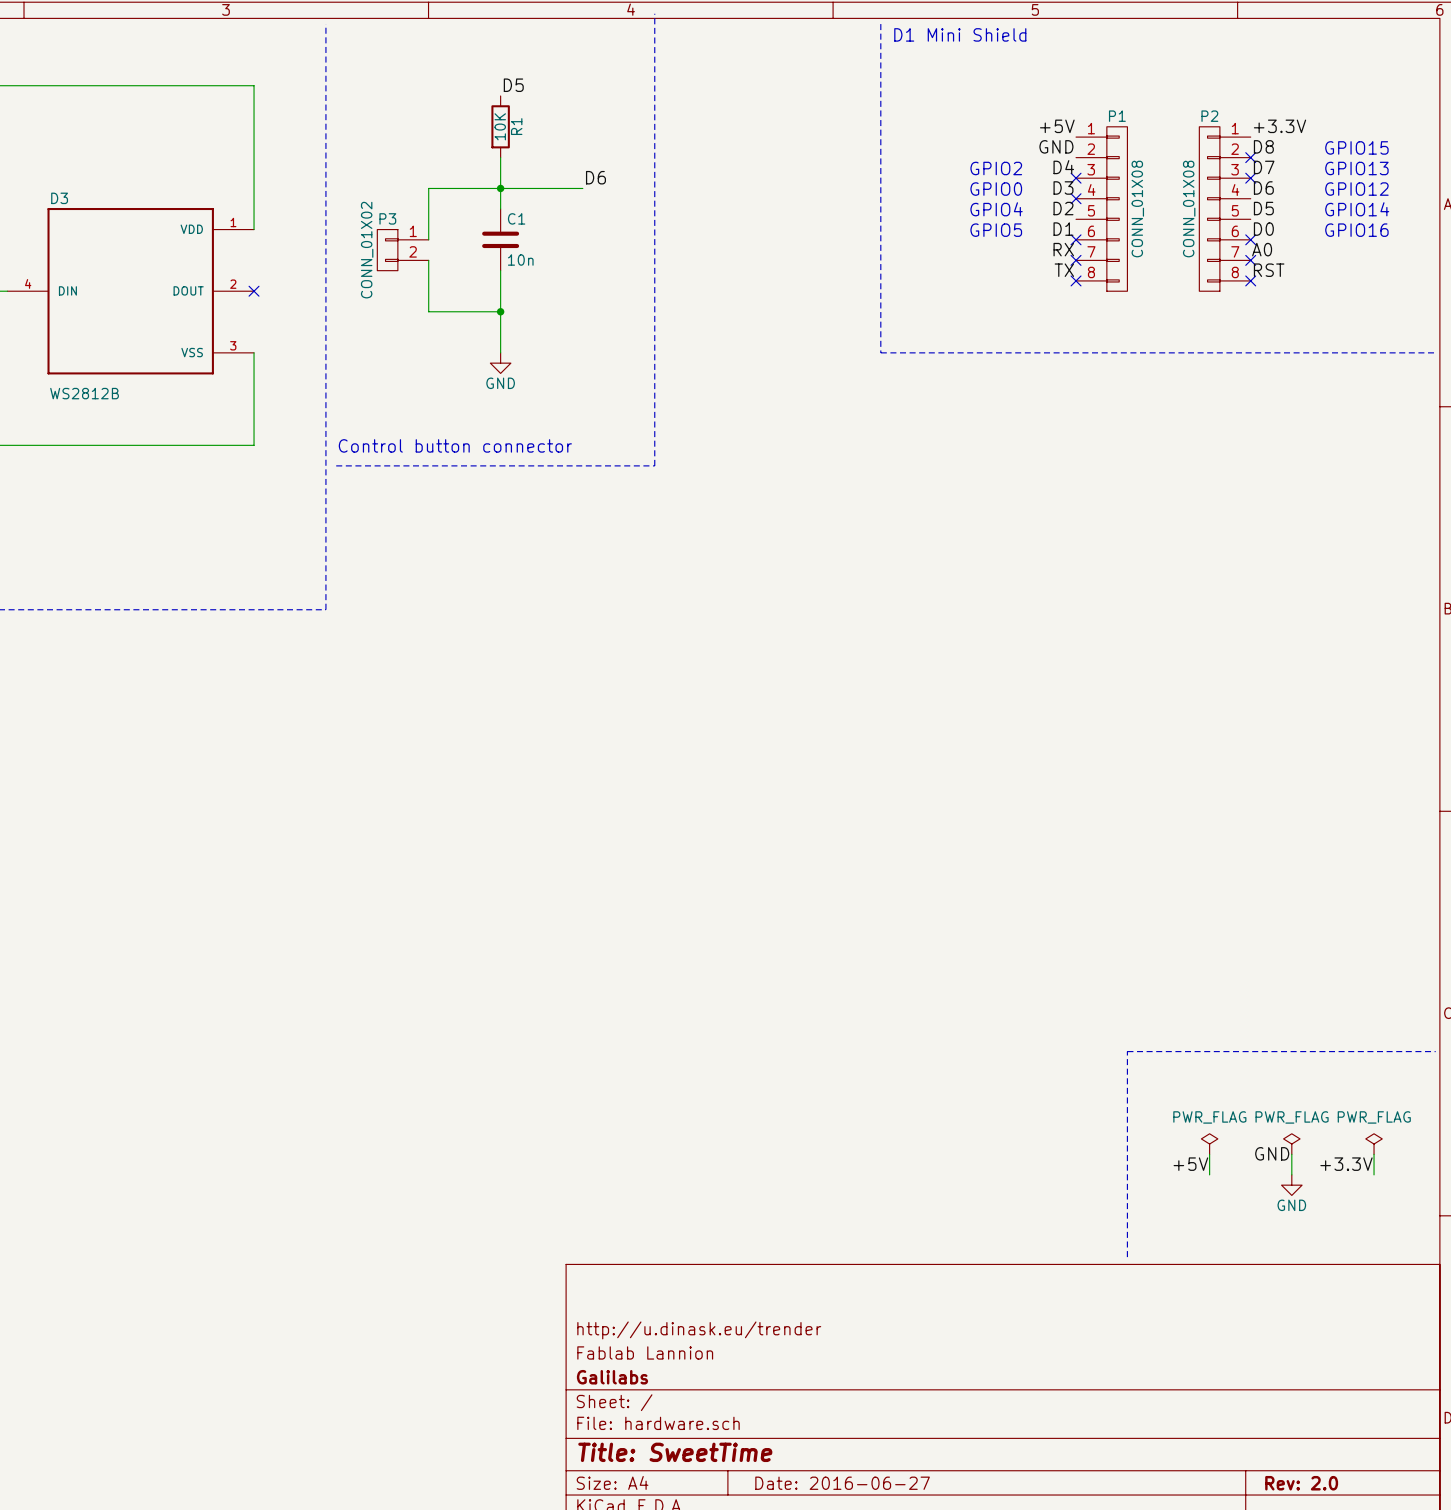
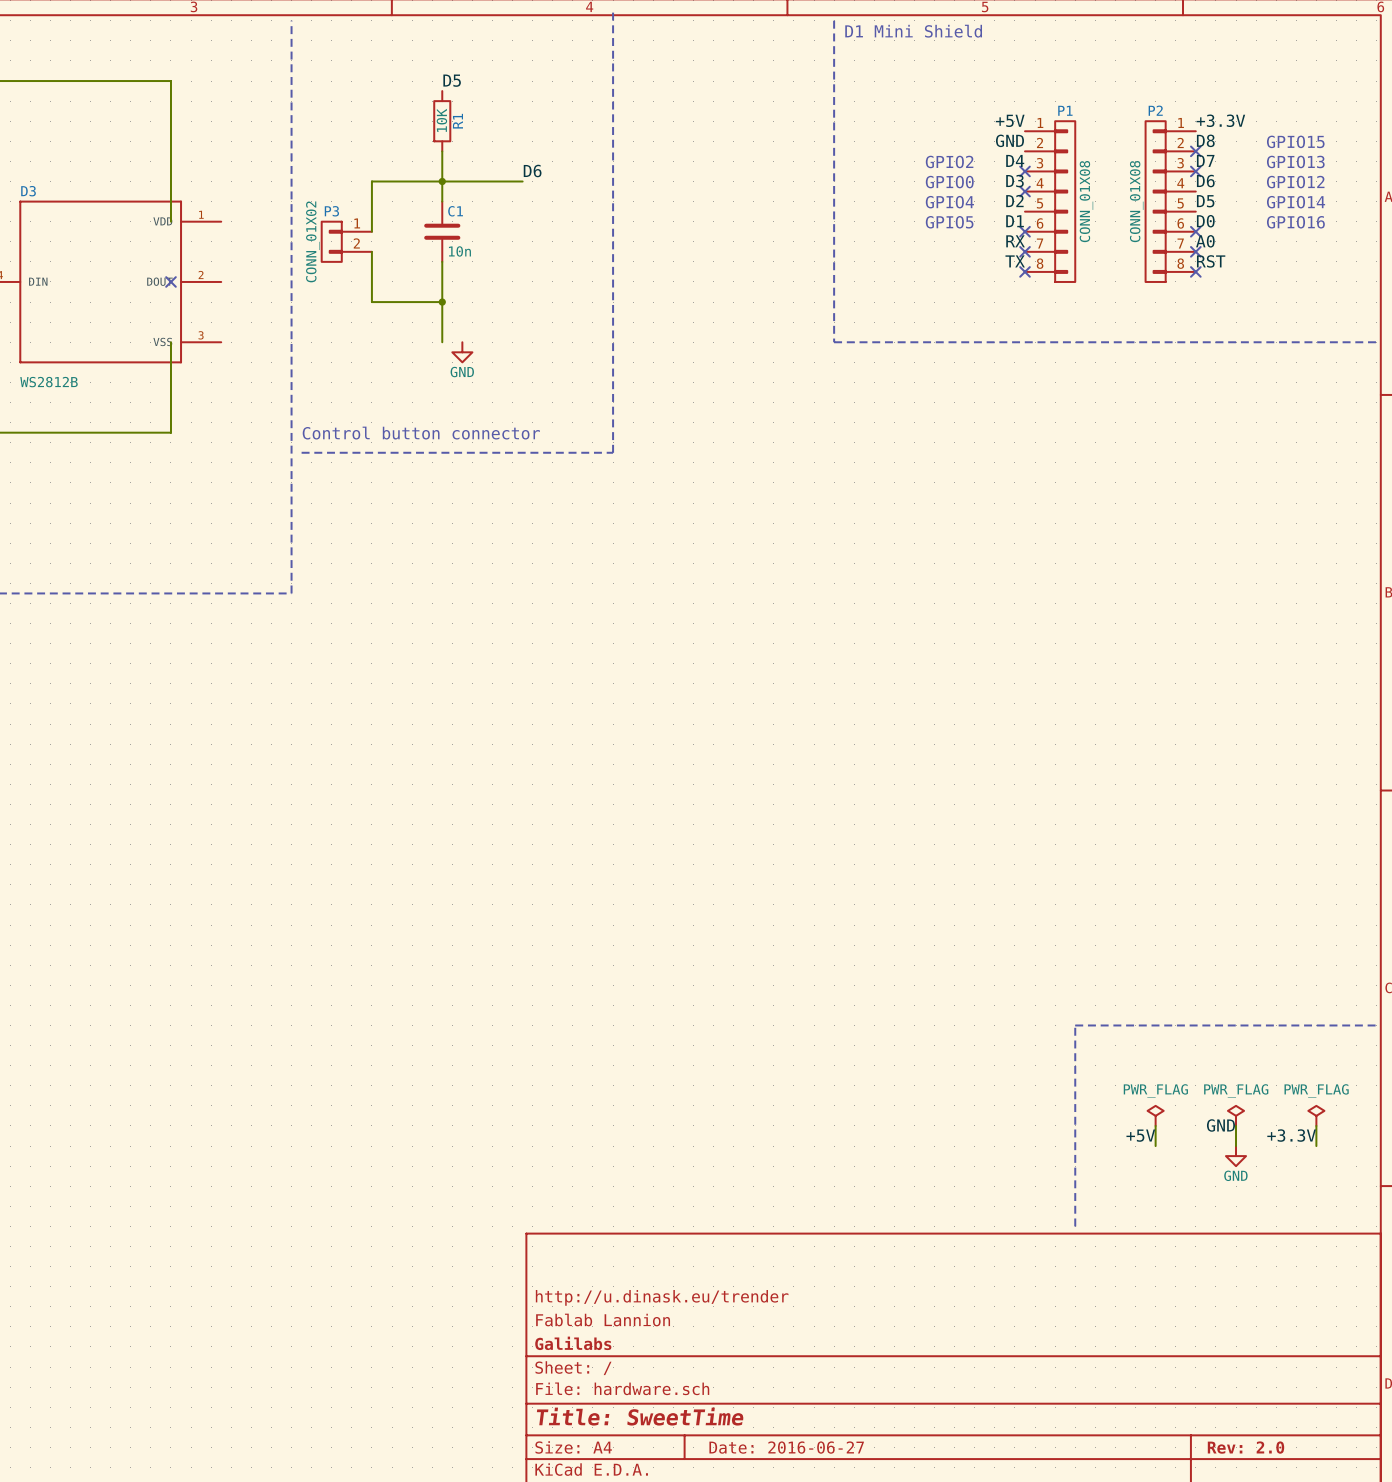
wire: (202, 85) (254, 85) (254, 229) -> (170, 81) (170, 221)
label position: D5 (513, 85) -> D5 (452, 80)
R1 position: (500, 126) -> (442, 121)
wire: (500, 157) (500, 209) -> (442, 151) (442, 201)
label position: D6 (595, 177) -> D6 (532, 170)
wire: (428, 188) (428, 239) -> (392, 181) (371, 181) (371, 231)
junction position: (500, 188) -> (442, 181)
wire: (562, 188) (582, 188) -> none
C1 position: (500, 239) -> (442, 231)
P3 position: (403, 250) -> (346, 241)
wire: (428, 260) (428, 311) -> (371, 251) (371, 302) (392, 302)
wire: (500, 270) (500, 352) -> (442, 261) (442, 342)
no-connect mark: none -> (170, 281)
no-connect mark: (254, 291) -> none
wire: (480, 311) (500, 311) -> none
junction position: (500, 311) -> (442, 302)
wire: (254, 352) (254, 445) (202, 445) -> (170, 342) (170, 432)

